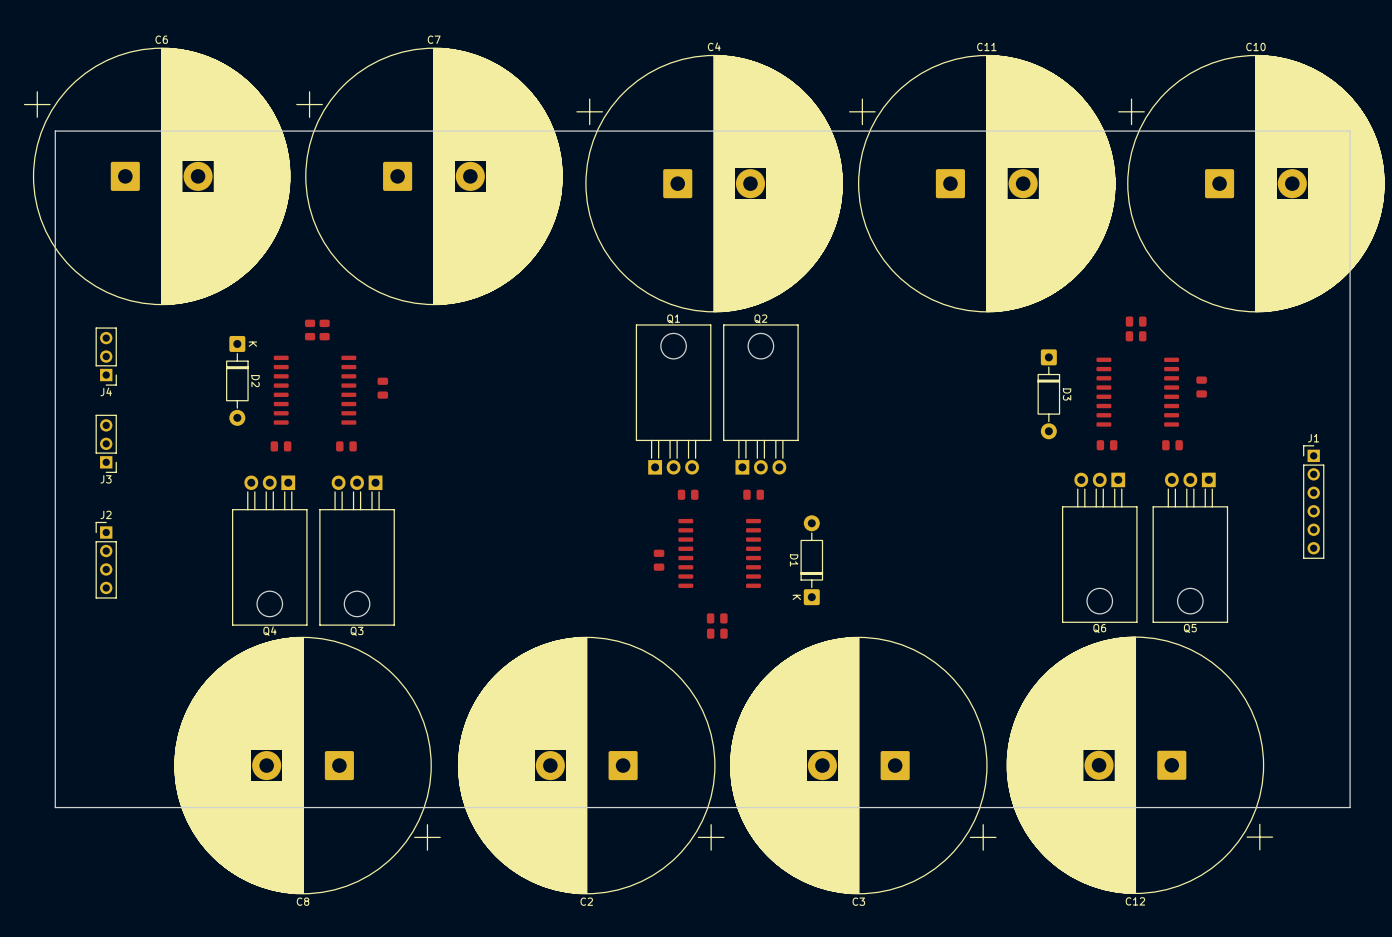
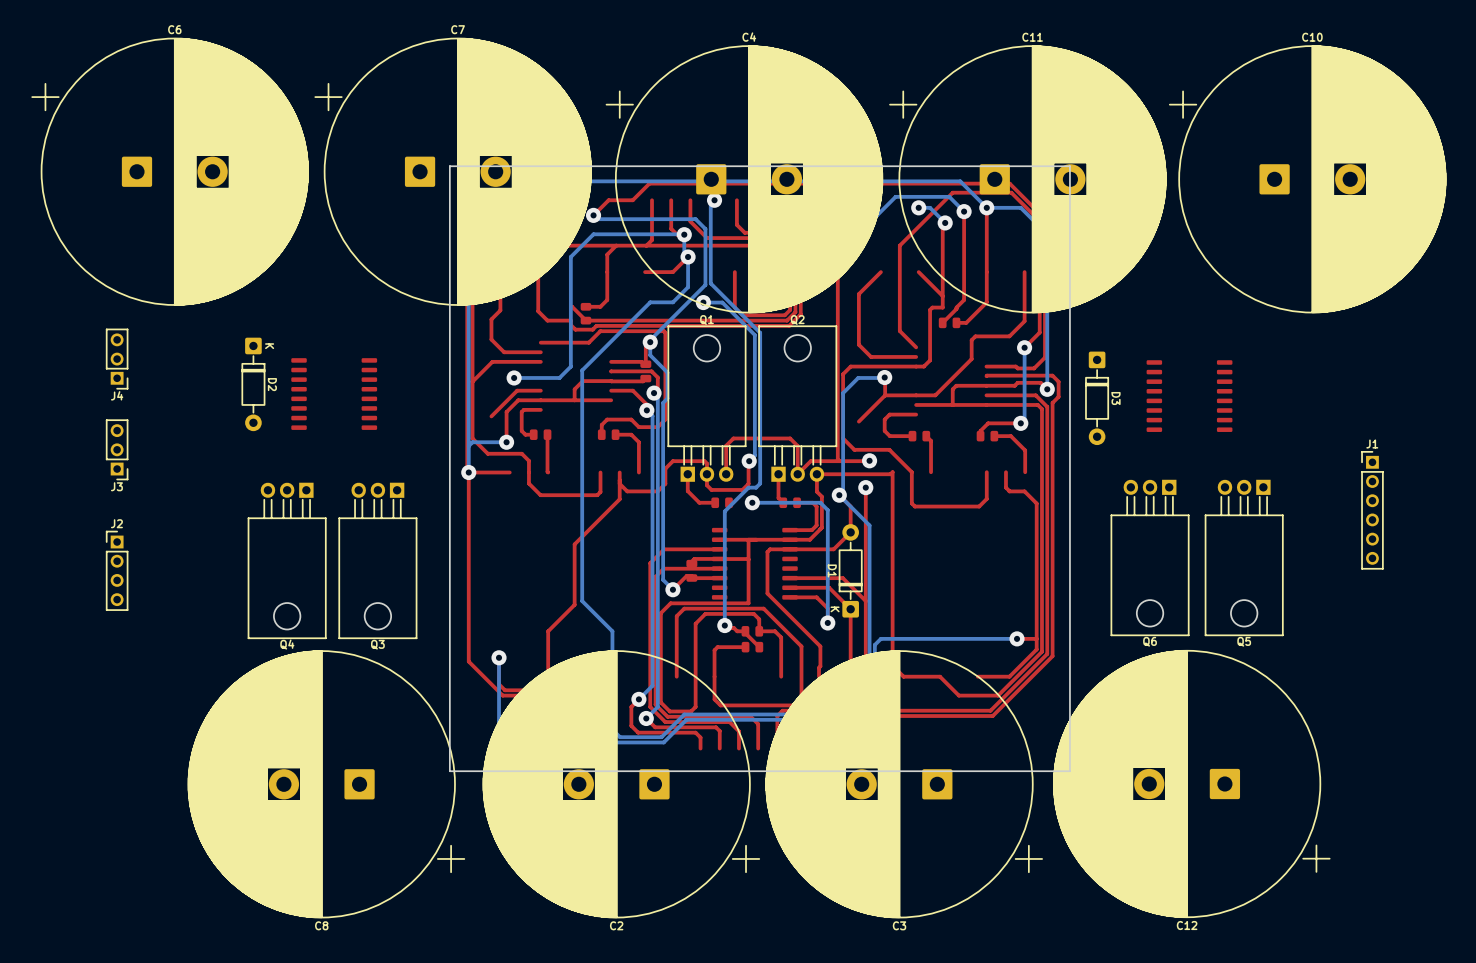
board edge: (1350, 131) (55, 131) (55, 807) (1350, 807) (1350, 131) -> none
board edge: none -> (1069, 166) (449, 166) (449, 771) (1069, 771) (1069, 166)
top track: none -> (652, 200) (652, 240) (646, 245)
top track: none -> (671, 200) (671, 228) (677, 234) (684, 234)
top track: none -> (690, 200) (690, 221) (706, 238) (759, 238) (790, 268) (790, 309) (784, 315) (742, 315) (734, 307) (734, 272)
bottom track: none -> (714, 200) (710, 204) (710, 283) (760, 332) (760, 483) (756, 487) (748, 487) (724, 511) (724, 625)
via: none -> (714, 200)
top track: none -> (736, 200) (736, 224) (744, 232) (762, 232) (795, 266) (795, 312) (787, 320) (585, 320) (570, 306)
top track: none -> (820, 200) (832, 212) (832, 264) (800, 296) (800, 314) (789, 325) (596, 325) (592, 329) (575, 329) (570, 325) (570, 320) (547, 320) (538, 311) (538, 254) (534, 250) (486, 250) (472, 264) (472, 438) (487, 453) (521, 453) (528, 460) (528, 483) (540, 495) (597, 495) (600, 492) (600, 472)
top track: none -> (839, 200) (837, 201) (837, 459) (839, 461)
bottom track: none -> (918, 207) (930, 207) (945, 222)
via: none -> (918, 207)
top track: none -> (986, 207) (986, 302) (966, 322) (956, 322)
via: none -> (986, 207)
top track: none -> (964, 211) (964, 300) (942, 322)
bottom track: none -> (964, 211) (949, 196) (895, 196) (877, 215) (839, 215) (816, 238)
via: none -> (964, 211)
top track: none -> (593, 215) (608, 200) (632, 200) (649, 183) (1009, 183) (1045, 218) (1045, 357) (1034, 368) (986, 366)
bottom track: none -> (593, 215) (597, 219) (695, 219) (705, 229) (705, 284) (650, 340) (650, 355) (667, 372) (667, 398) (663, 402) (663, 579) (672, 589)
via: none -> (593, 215)
top track: none -> (945, 222) (942, 225) (942, 307) (932, 307) (930, 309) (930, 360) (923, 366) (850, 366) (843, 374) (843, 438) (854, 449) (889, 449) (911, 472) (911, 503) (914, 506) (979, 506) (986, 498) (986, 472)
via: none -> (945, 222)
via: none -> (684, 234)
top track: none -> (616, 245) (607, 254) (607, 299) (600, 306) (585, 306)
top track: none -> (688, 256) (672, 272) (645, 272)
via: none -> (688, 256)
top track: none -> (500, 272) (500, 310) (491, 319) (491, 339) (504, 352) (540, 352)
top track: none -> (772, 272) (772, 258) (759, 245) (483, 245) (467, 262) (467, 470) (468, 472)
top track: none -> (880, 272) (858, 294) (858, 344) (871, 356) (916, 356)
top track: none -> (918, 272) (942, 296)
top track: none -> (1024, 272) (1024, 321) (1009, 336) (975, 336) (971, 340) (971, 359) (935, 395) (885, 395)
bottom track: none -> (703, 302) (722, 302) (754, 335) (754, 455) (749, 461)
via: none -> (703, 302)
part: none -> (585, 313)
part: none -> (949, 322)
part: (1136, 321) -> none
part: (310, 330) -> none
part: (324, 330) -> none
part: (1136, 336) -> none
top track: none -> (540, 342) (588, 342) (600, 331) (665, 332) (665, 419) (657, 427) (638, 427) (631, 419) (607, 419) (601, 424) (601, 434)
top track: none -> (650, 342) (645, 346) (645, 364) (641, 361) (611, 361)
via: none -> (650, 342)
top track: none -> (916, 347) (899, 331) (899, 245) (952, 192) (1011, 192) (1039, 221) (1039, 332) (1024, 347)
bottom track: none -> (1024, 347) (1024, 419) (1020, 423)
via: none -> (1024, 347)
top track: none -> (540, 361) (492, 361) (472, 381)
top track: none -> (611, 371) (651, 371) (657, 377) (657, 389) (654, 393)
part: none -> (645, 371)
top track: none -> (986, 376) (1052, 375) (1058, 381) (1058, 396) (1052, 402) (1052, 656) (992, 716) (805, 716) (796, 724) (796, 748)
via: none -> (514, 377)
top track: none -> (884, 377) (885, 395)
bottom track: none -> (884, 377) (858, 377) (843, 393) (843, 491) (839, 495) (869, 525) (869, 669) (824, 714) (684, 714) (661, 737) (620, 737) (612, 729) (612, 631) (582, 601) (582, 370) (650, 302) (672, 302) (688, 287) (688, 256) (684, 253) (684, 234) (593, 234) (570, 256) (570, 366) (559, 377) (514, 377)
via: none -> (884, 377)
top track: none -> (645, 378) (643, 381) (582, 381) (574, 389) (574, 400)
top track: none -> (1047, 389) (1040, 382) (1017, 382) (1014, 385) (956, 385) (952, 389) (952, 404)
bottom track: none -> (1047, 389) (1047, 234) (1020, 207) (986, 207) (960, 181) (555, 181) (468, 268) (468, 472)
via: none -> (1047, 389)
top track: none -> (540, 390) (517, 390) (491, 416)
top track: none -> (611, 390) (632, 390) (646, 404) (646, 410)
part: (1201, 387) -> none
part: (382, 388) -> none
bottom track: none -> (654, 393) (657, 396) (657, 706) (646, 718)
via: none -> (654, 393)
top track: none -> (885, 395) (858, 421)
top track: none -> (986, 395) (1035, 395) (1047, 406) (1047, 654) (990, 710) (782, 710) (777, 715) (777, 748)
top track: none -> (611, 400) (518, 400) (506, 412) (506, 442)
top track: none -> (916, 404) (1037, 404) (1041, 409) (1041, 651) (998, 695) (958, 695) (940, 676) (903, 676) (892, 665) (892, 472) (890, 474) (816, 474) (816, 491) (821, 496) (820, 529)
top track: none -> (540, 409) (523, 409) (521, 412) (521, 430) (525, 434) (533, 434)
bottom track: none -> (646, 410) (652, 416) (652, 685) (638, 699)
via: none -> (646, 410)
top track: none -> (916, 414) (889, 414) (884, 419) (884, 430) (889, 436) (912, 436)
top track: none -> (1020, 423) (988, 423) (980, 430) (980, 436)
via: none -> (1020, 423)
part: none -> (540, 434)
top track: none -> (547, 434) (548, 472)
part: none -> (608, 434)
top track: none -> (615, 434) (631, 434) (638, 442) (638, 472)
part: none -> (919, 436)
top track: none -> (926, 436) (931, 440) (931, 472)
part: none -> (987, 436)
top track: none -> (994, 436) (1010, 436) (1025, 450) (1025, 472)
bottom track: none -> (506, 442) (472, 442) (468, 446)
via: none -> (506, 442)
part: (1107, 445) -> none
part: (1172, 445) -> none
part: (280, 446) -> none
part: (346, 446) -> none
top track: none -> (749, 461) (748, 483) (742, 489) (711, 489) (706, 485) (706, 463) (704, 461) (672, 461) (665, 468) (665, 483) (657, 491) (627, 491) (619, 483)
via: none -> (749, 461)
top track: none -> (869, 460) (810, 461) (797, 474) (797, 446) (790, 438) (733, 438) (726, 445) (726, 474)
via: none -> (869, 460)
top track: none -> (468, 472) (468, 661) (502, 695) (567, 695) (585, 676)
via: none -> (468, 472)
top track: none -> (509, 472) (468, 472)
top track: none -> (619, 472) (619, 499) (574, 544) (574, 604) (548, 631) (548, 688) (545, 690) (504, 690) (499, 684) (499, 657)
top track: none -> (1005, 472) (1005, 487) (1009, 491) (1024, 491) (1036, 503) (1036, 649) (1009, 676) (977, 676)
top track: none -> (687, 474) (687, 491) (699, 502) (715, 502)
top track: none -> (778, 474) (778, 498) (783, 502)
top track: none -> (865, 487) (865, 672) (833, 705) (720, 705) (714, 699) (714, 650) (717, 647) (745, 647)
via: none -> (865, 487)
top track: none -> (839, 495) (850, 506) (850, 532) (833, 549) (770, 549) (767, 551) (767, 593) (820, 646) (819, 676)
via: none -> (839, 495)
bottom track: none -> (752, 502) (820, 502) (827, 510) (827, 622)
via: none -> (752, 502)
top track: none -> (797, 502) (812, 502) (816, 506) (816, 525) (811, 530) (790, 530)
top track: none -> (820, 529) (809, 539) (719, 539)
top track: none -> (748, 539) (748, 603) (670, 603) (660, 613) (660, 702) (669, 711) (691, 711) (695, 706) (695, 623) (705, 613) (753, 613) (759, 619) (759, 631) (775, 631) (781, 637) (781, 676)
top track: none -> (719, 549) (664, 549) (650, 563) (650, 706) (665, 722) (729, 722) (738, 731) (738, 748)
top track: none -> (719, 558) (694, 558) (691, 561)
top track: none -> (719, 559) (748, 559)
top track: none -> (719, 568) (663, 568) (655, 576) (655, 704) (667, 716) (750, 716) (758, 724) (758, 748)
top track: none -> (719, 578) (694, 578) (686, 575) (672, 589)
top track: none -> (790, 578) (842, 578) (865, 601)
top track: none -> (790, 587) (829, 587) (850, 609) (850, 680) (831, 700) (806, 700) (801, 695) (801, 646) (763, 608) (684, 608) (676, 616) (676, 676)
via: none -> (672, 589)
top track: none -> (790, 597) (816, 597) (827, 608) (827, 622)
via: none -> (827, 622)
top track: none -> (724, 625) (727, 627) (733, 627) (737, 631) (745, 631) (759, 647)
via: none -> (724, 625)
bottom track: none -> (1017, 638) (880, 638) (874, 644) (874, 671) (826, 719) (686, 719) (663, 742) (519, 742) (499, 722) (499, 657)
via: none -> (1017, 638)
top track: none -> (1036, 638) (1017, 638)
via: none -> (499, 657)
top track: none -> (638, 699) (631, 706) (631, 725) (638, 732) (695, 732) (700, 737) (700, 748)
via: none -> (638, 699)
top track: none -> (646, 718) (655, 727) (716, 727) (719, 731) (719, 748)
via: none -> (646, 718)

